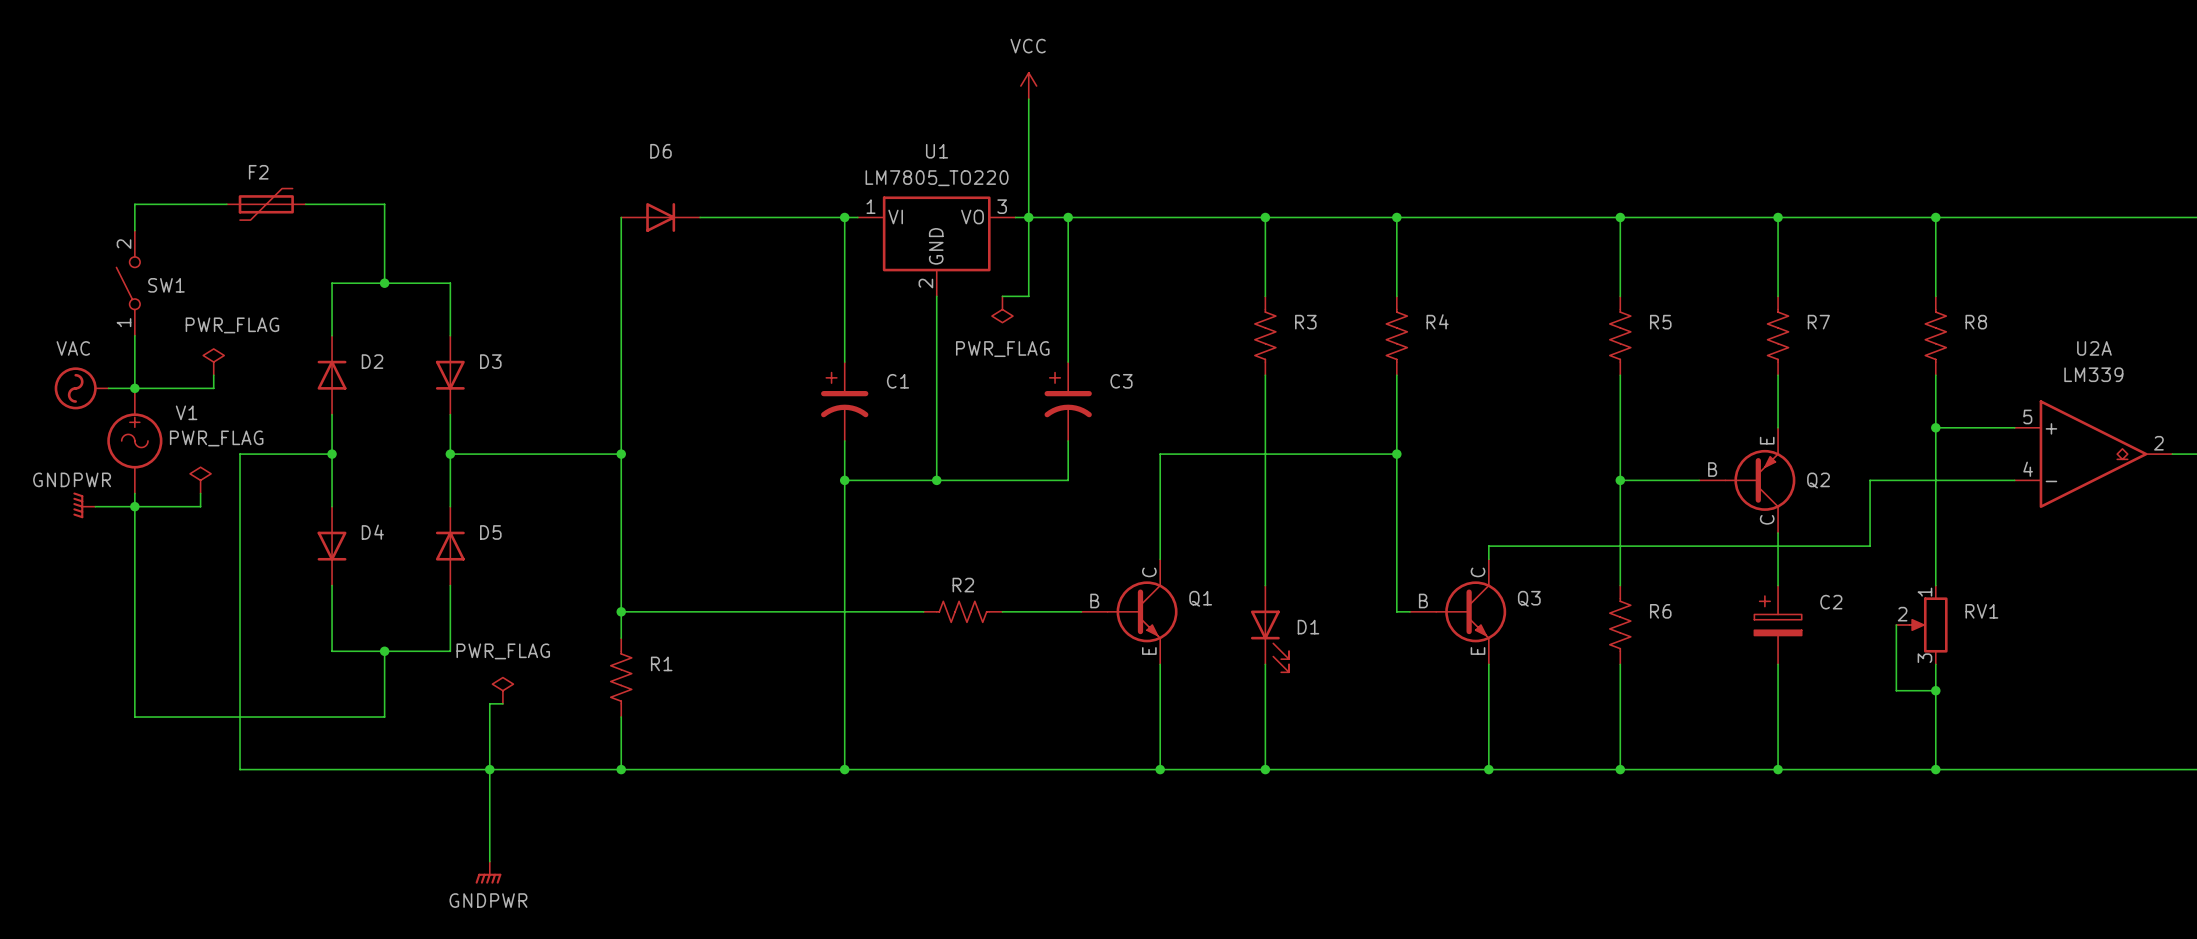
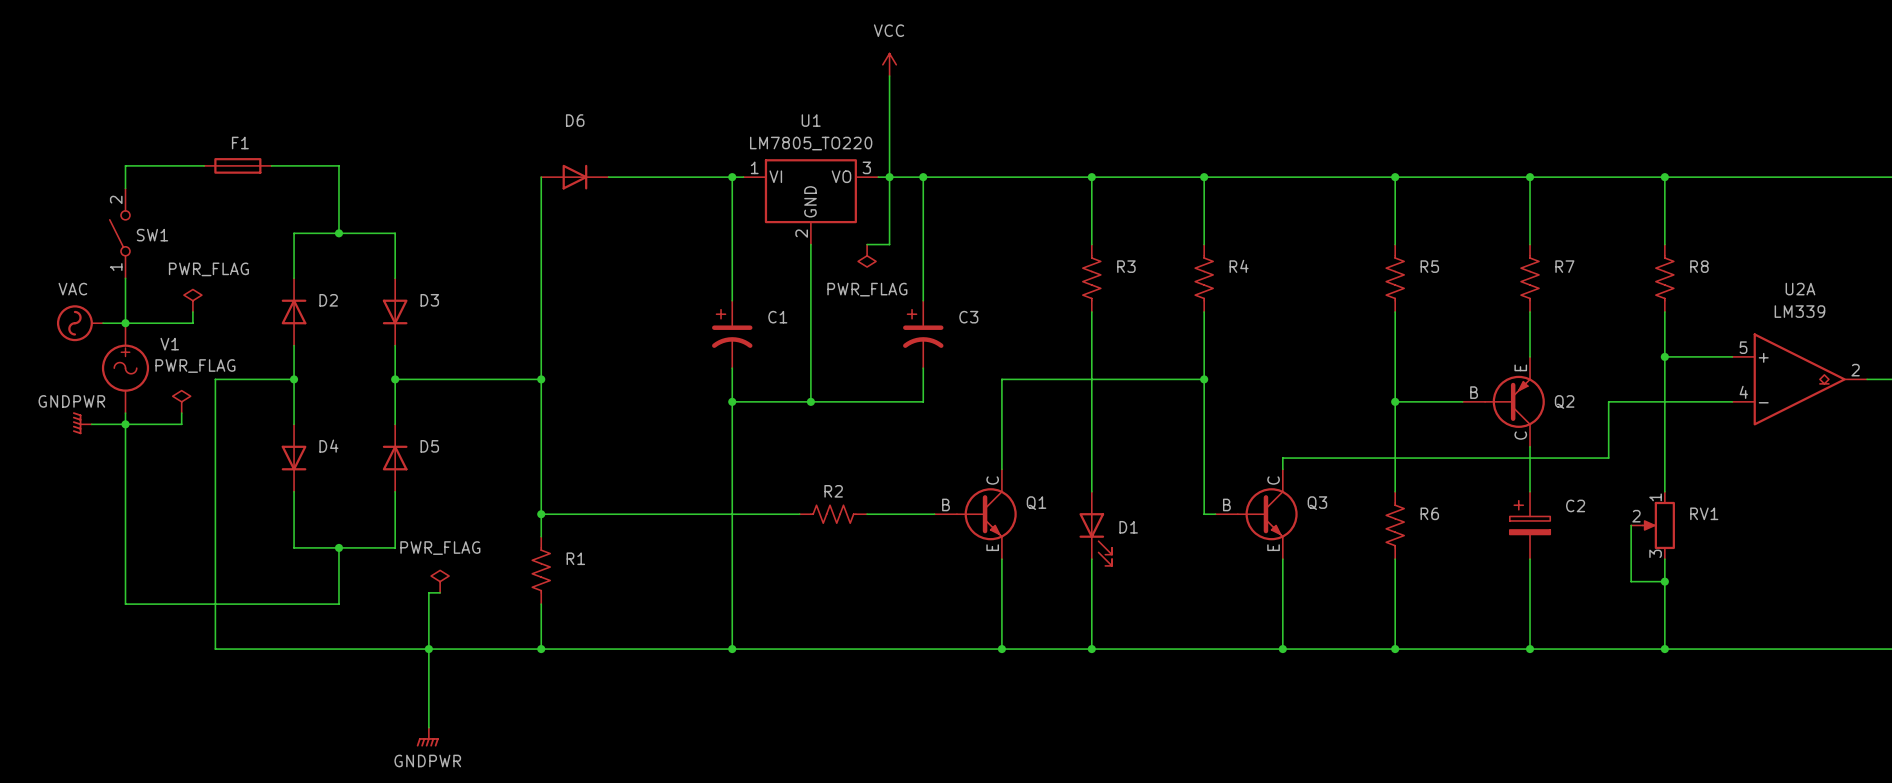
F2: (266, 204) -> none
F1: none -> (237, 165)

